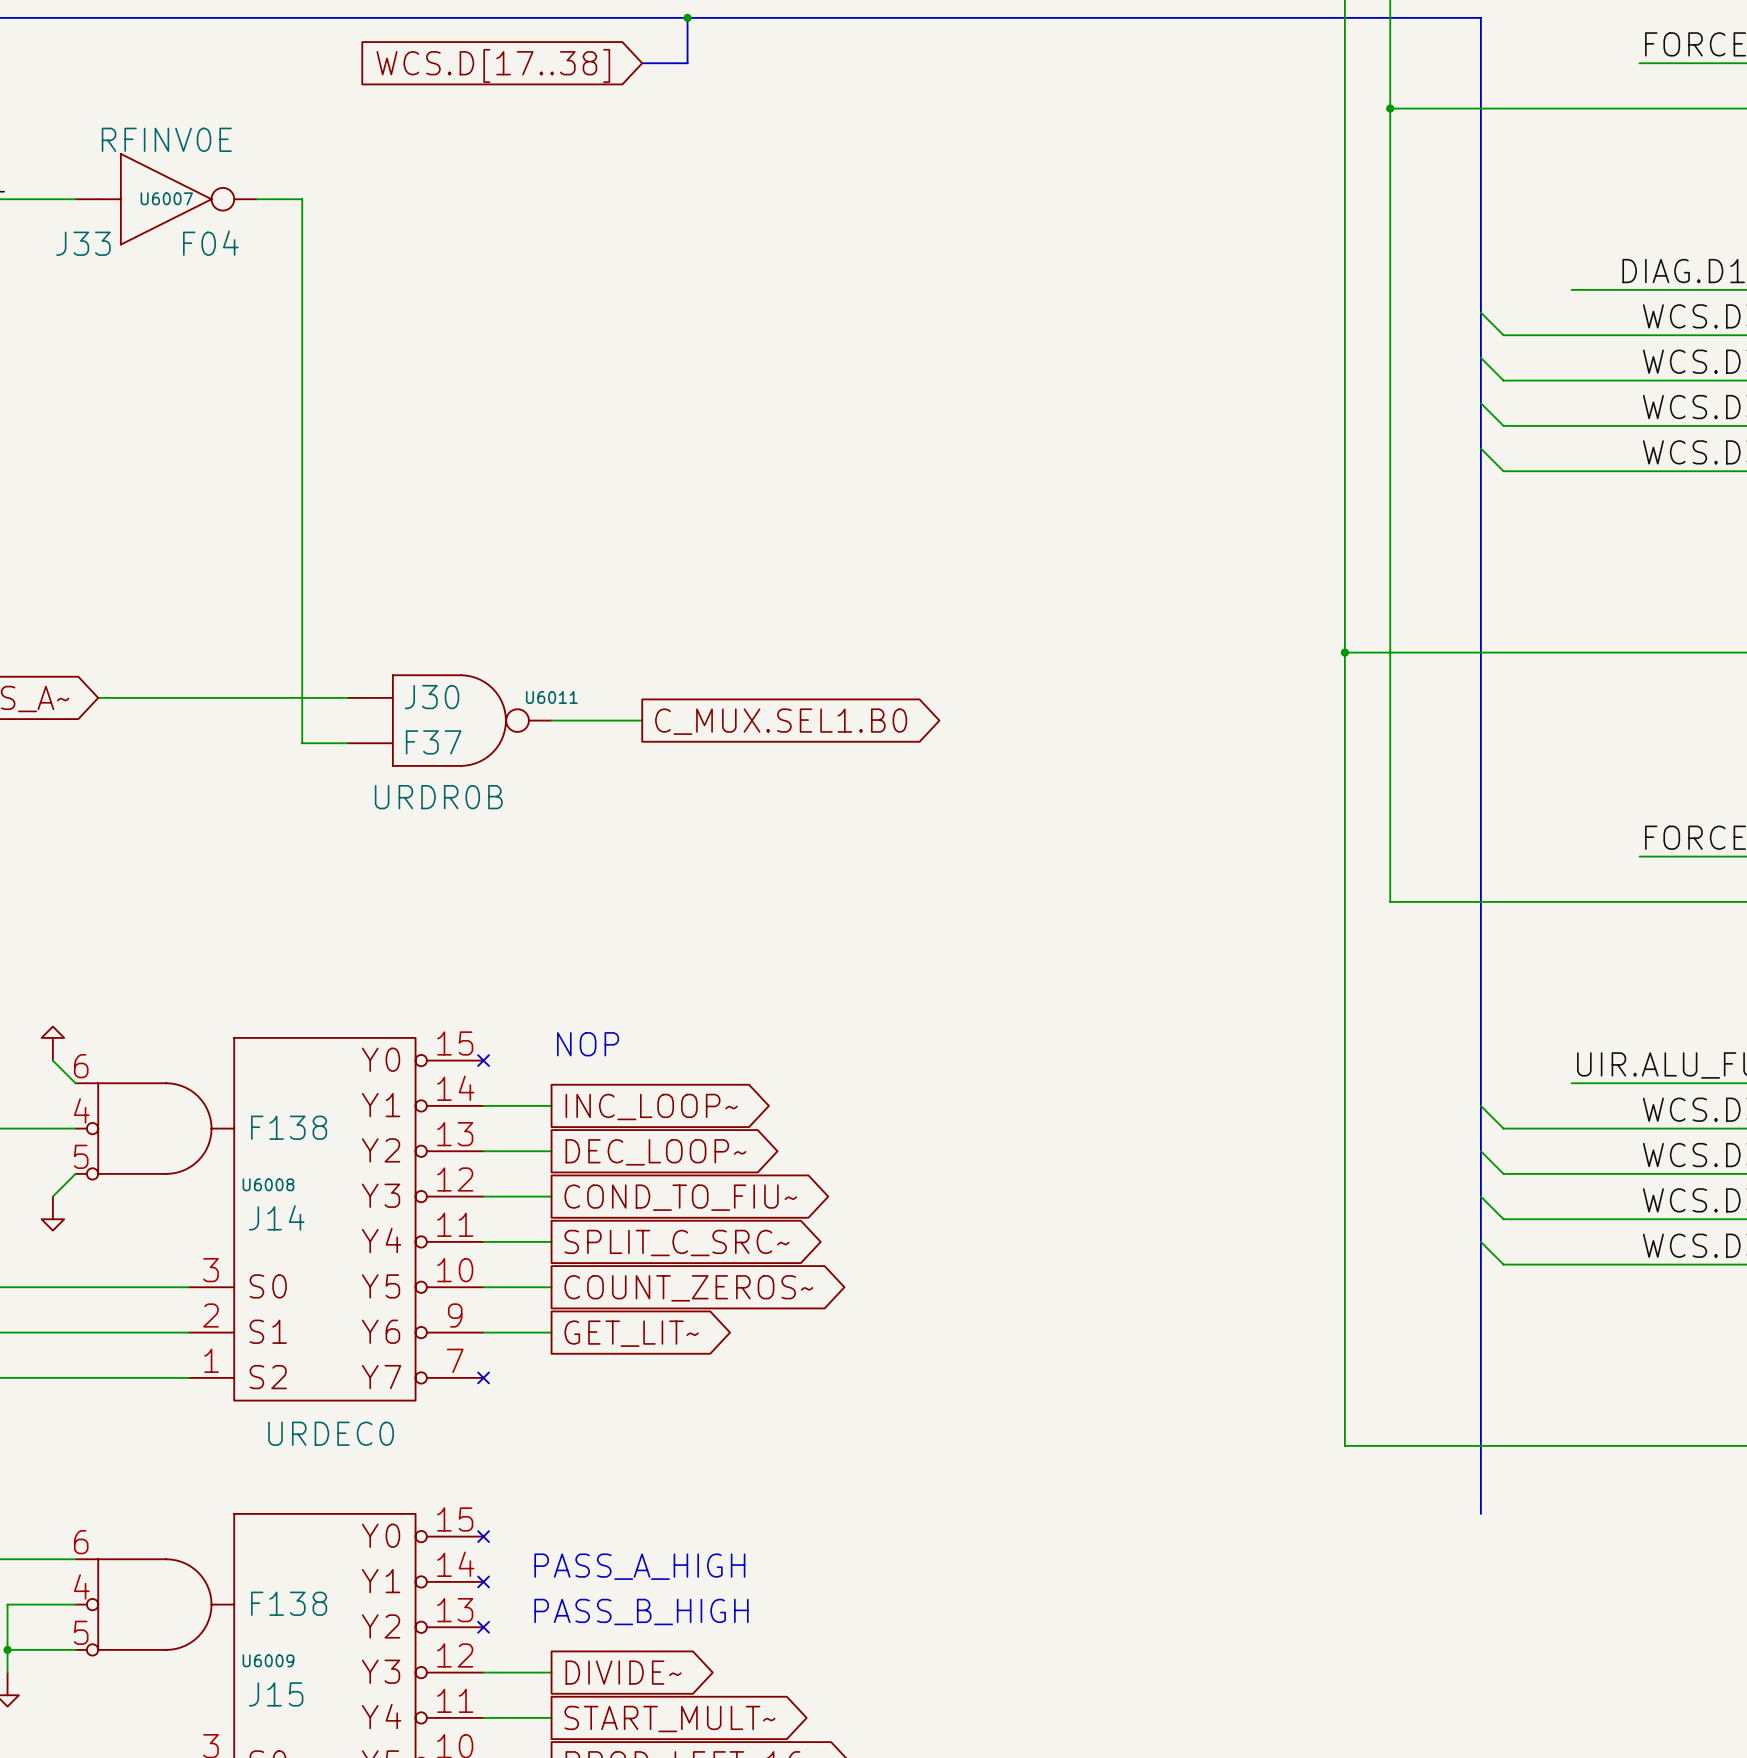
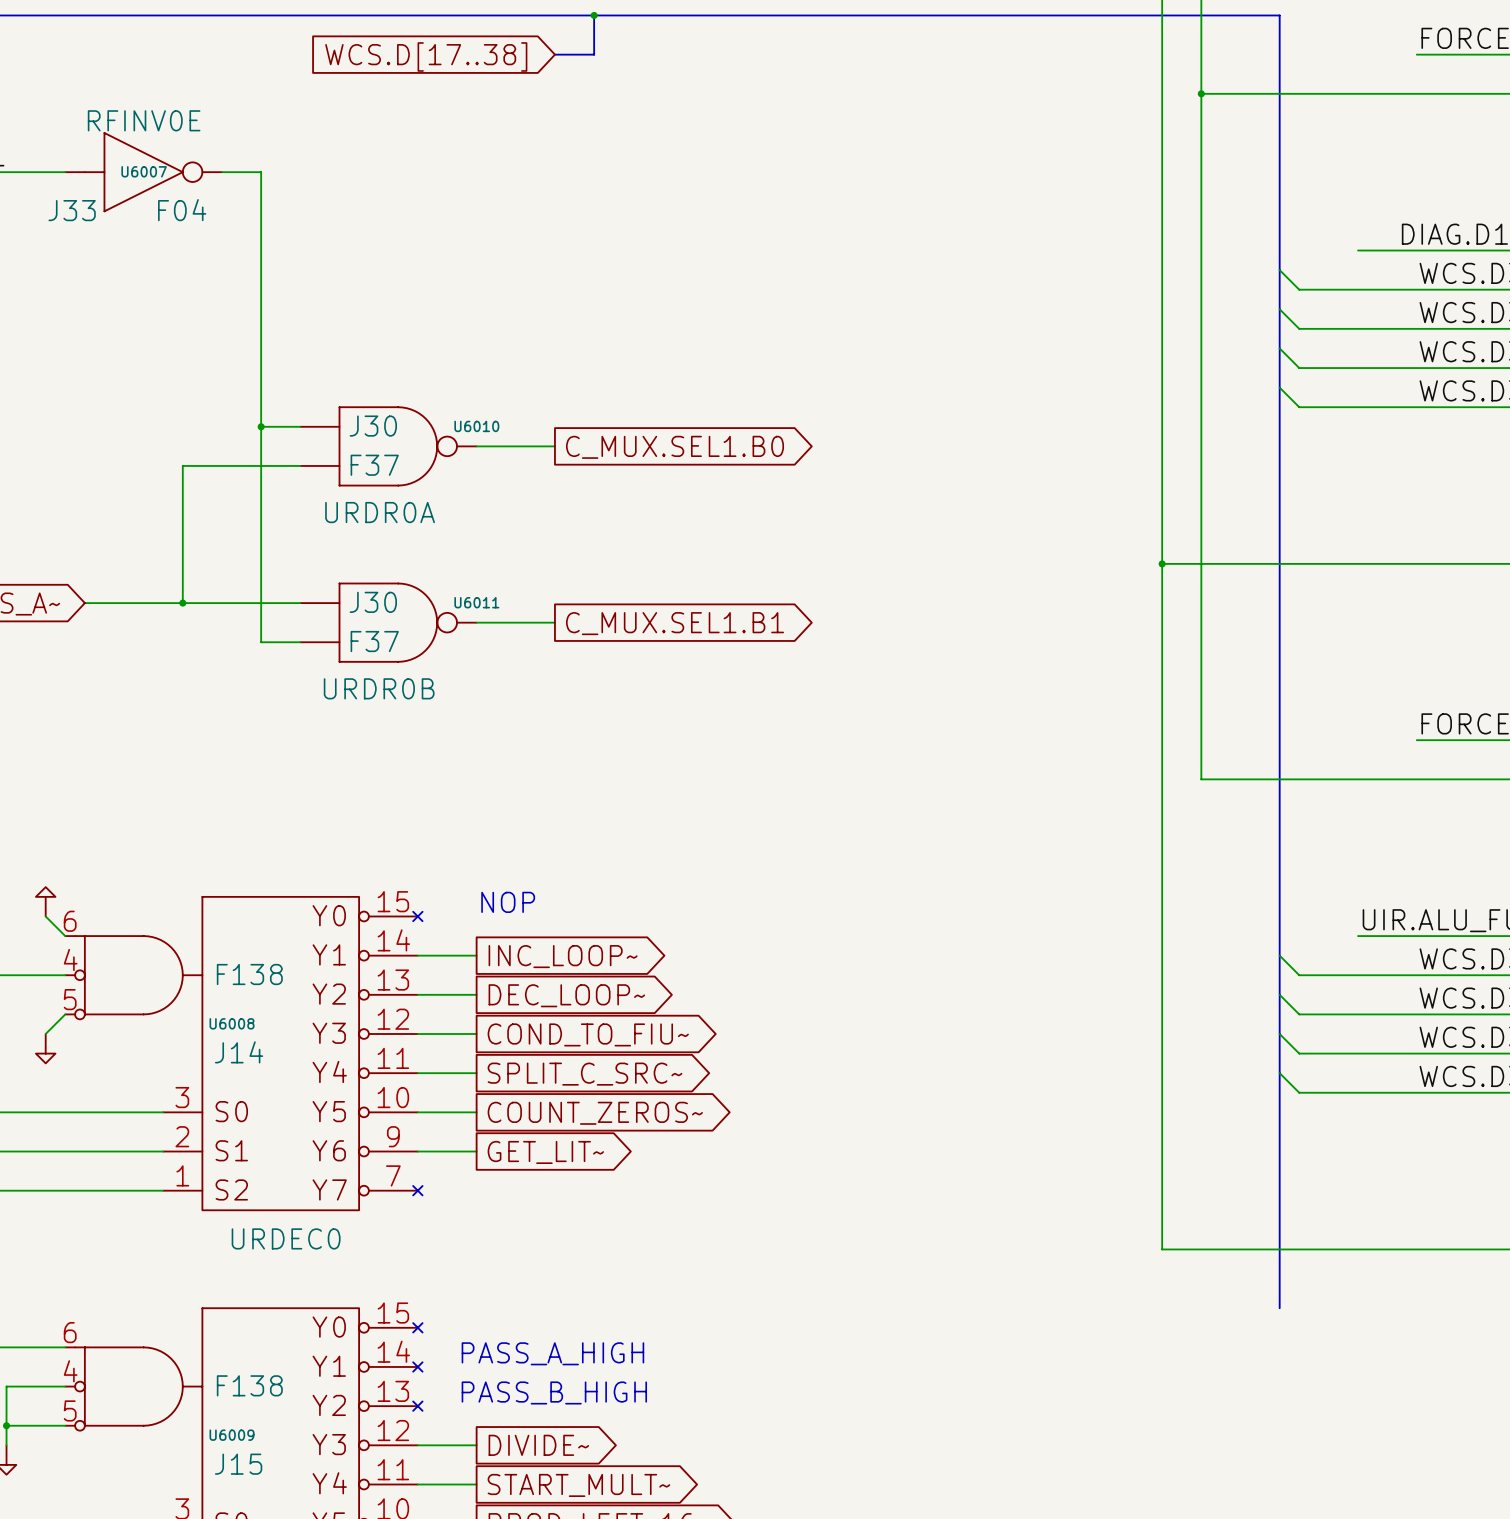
wire: none -> (261, 426) (300, 426)
junction: none -> (261, 426)
U6010: none -> F37 (388, 446)
wire: none -> (476, 446) (554, 446)
global label: none -> C_MUX.SEL1.B0 (675, 447)
wire: none -> (300, 465) (182, 465) (182, 603)
junction: none -> (182, 603)
global label: C_MUX.SEL1.B0 (781, 721) -> C_MUX.SEL1.B1 (675, 623)

